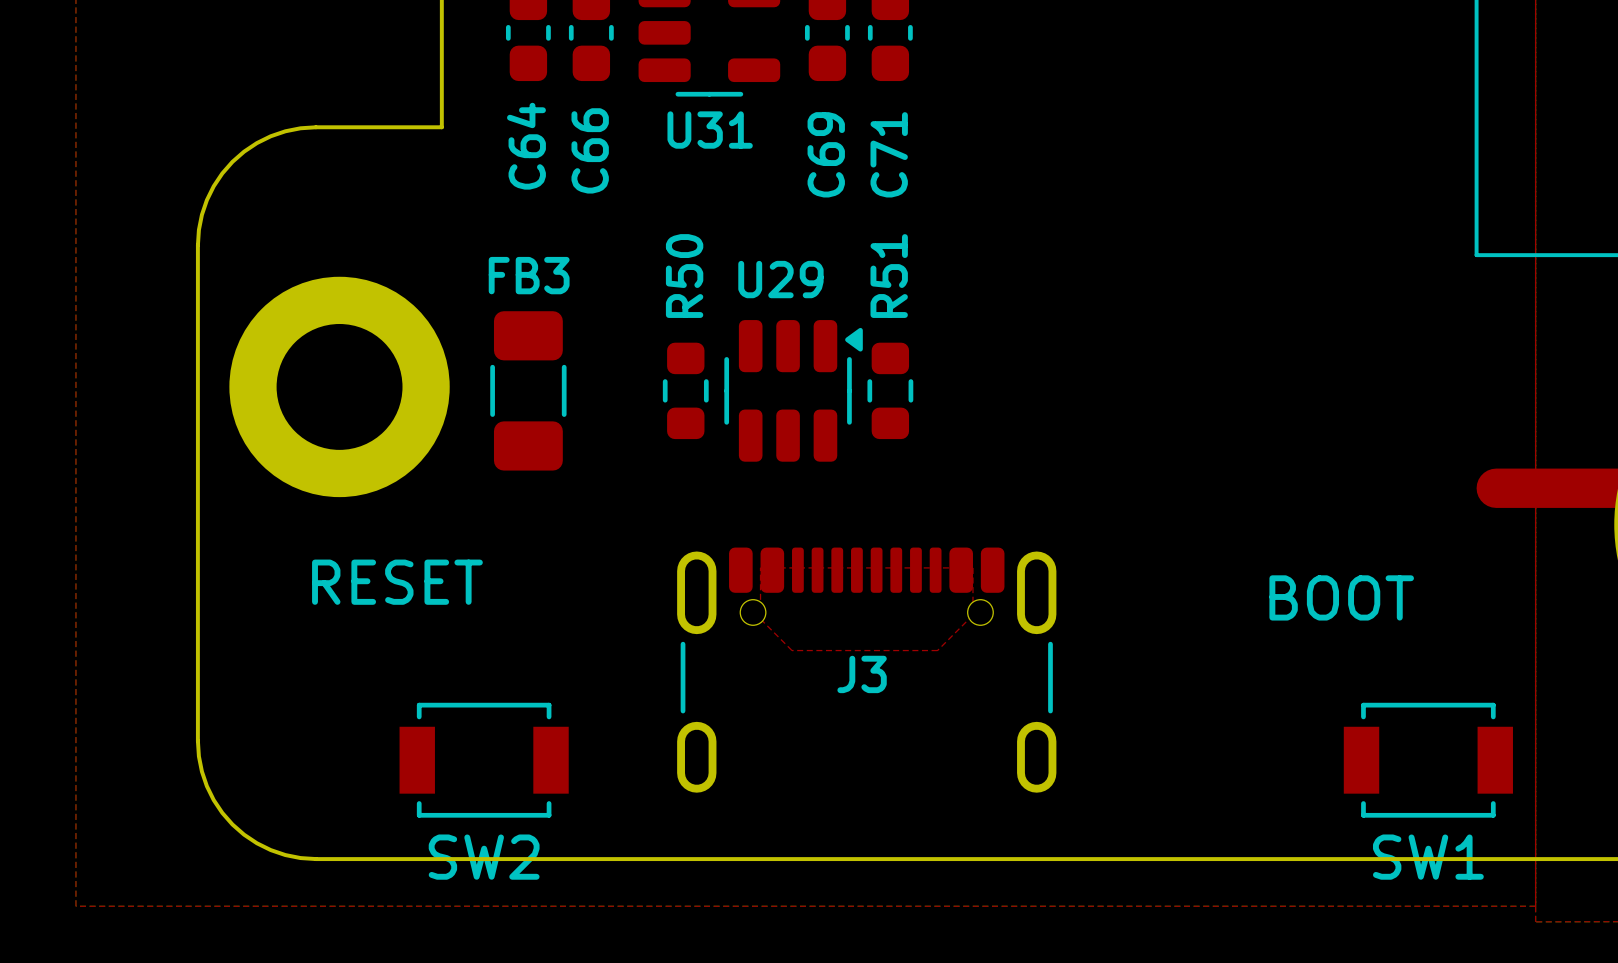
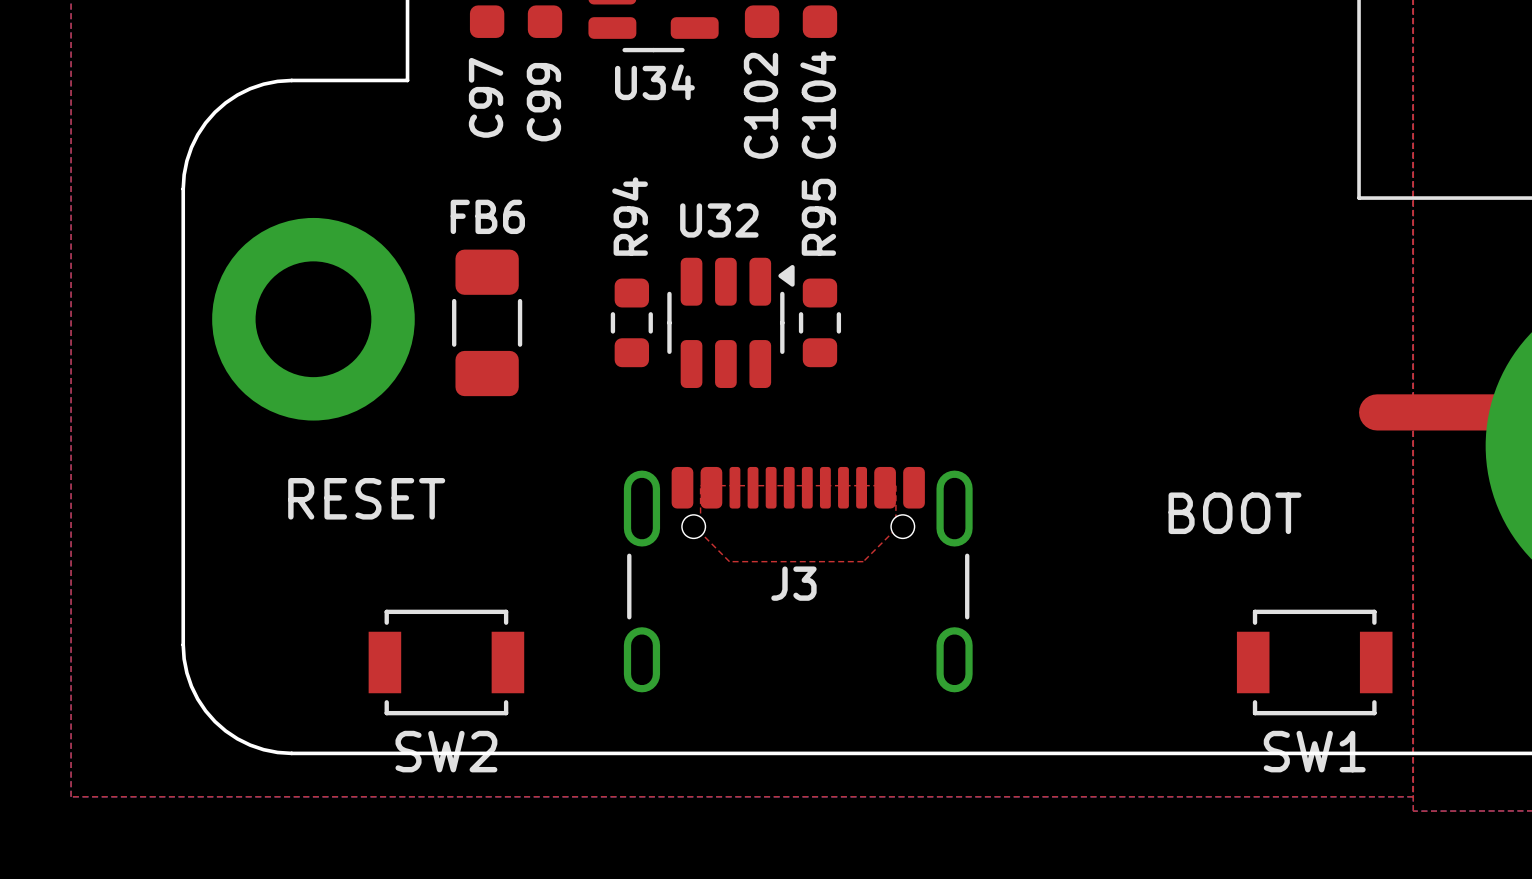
U31 name: U31 (710, 130) -> U34 (654, 82)
C64 name: C64 (526, 146) -> C97 (486, 97)
C66 name: C66 (590, 150) -> C99 (543, 102)
C69 name: C69 (826, 154) -> C102 (761, 105)
C71 name: C71 (889, 154) -> C104 (818, 105)
FB3 name: FB3 (529, 275) -> FB6 (487, 216)
R50 name: R50 (684, 276) -> R94 (630, 216)
R51 name: R51 (889, 276) -> R95 (818, 217)
U29 name: U29 (780, 279) -> U32 (719, 220)

